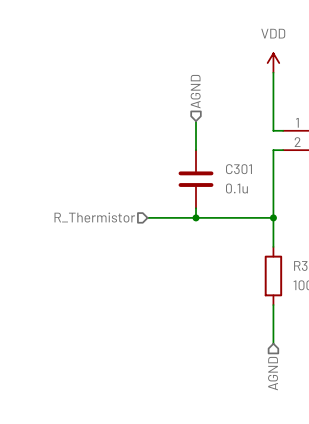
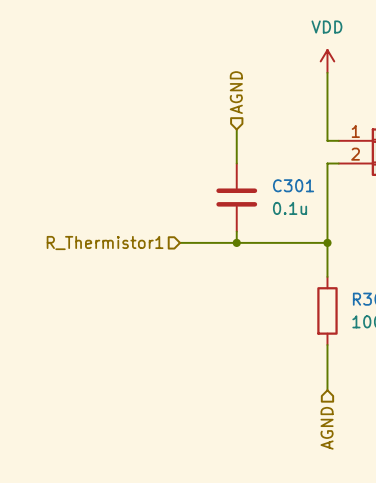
hierarchical label: R_Thermistor (94, 217) -> R_Thermistor1 (105, 243)

